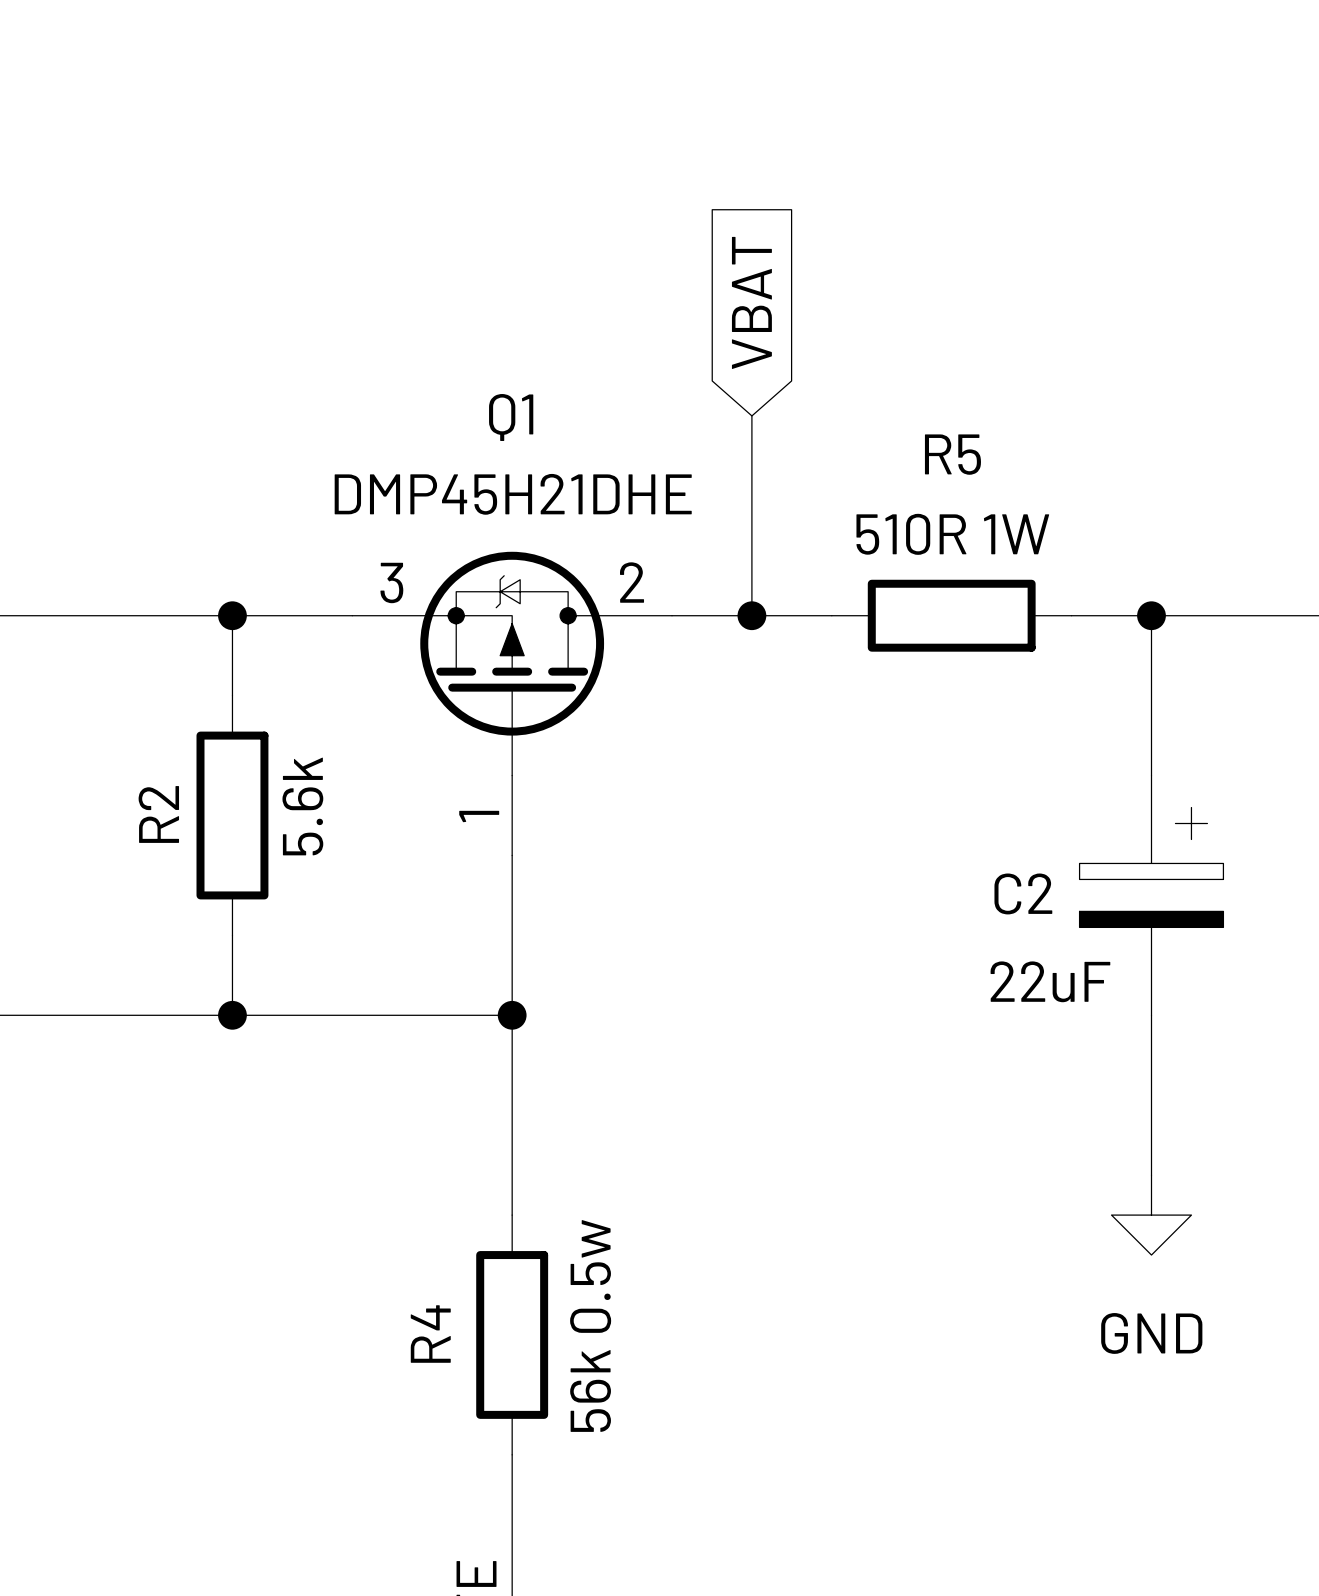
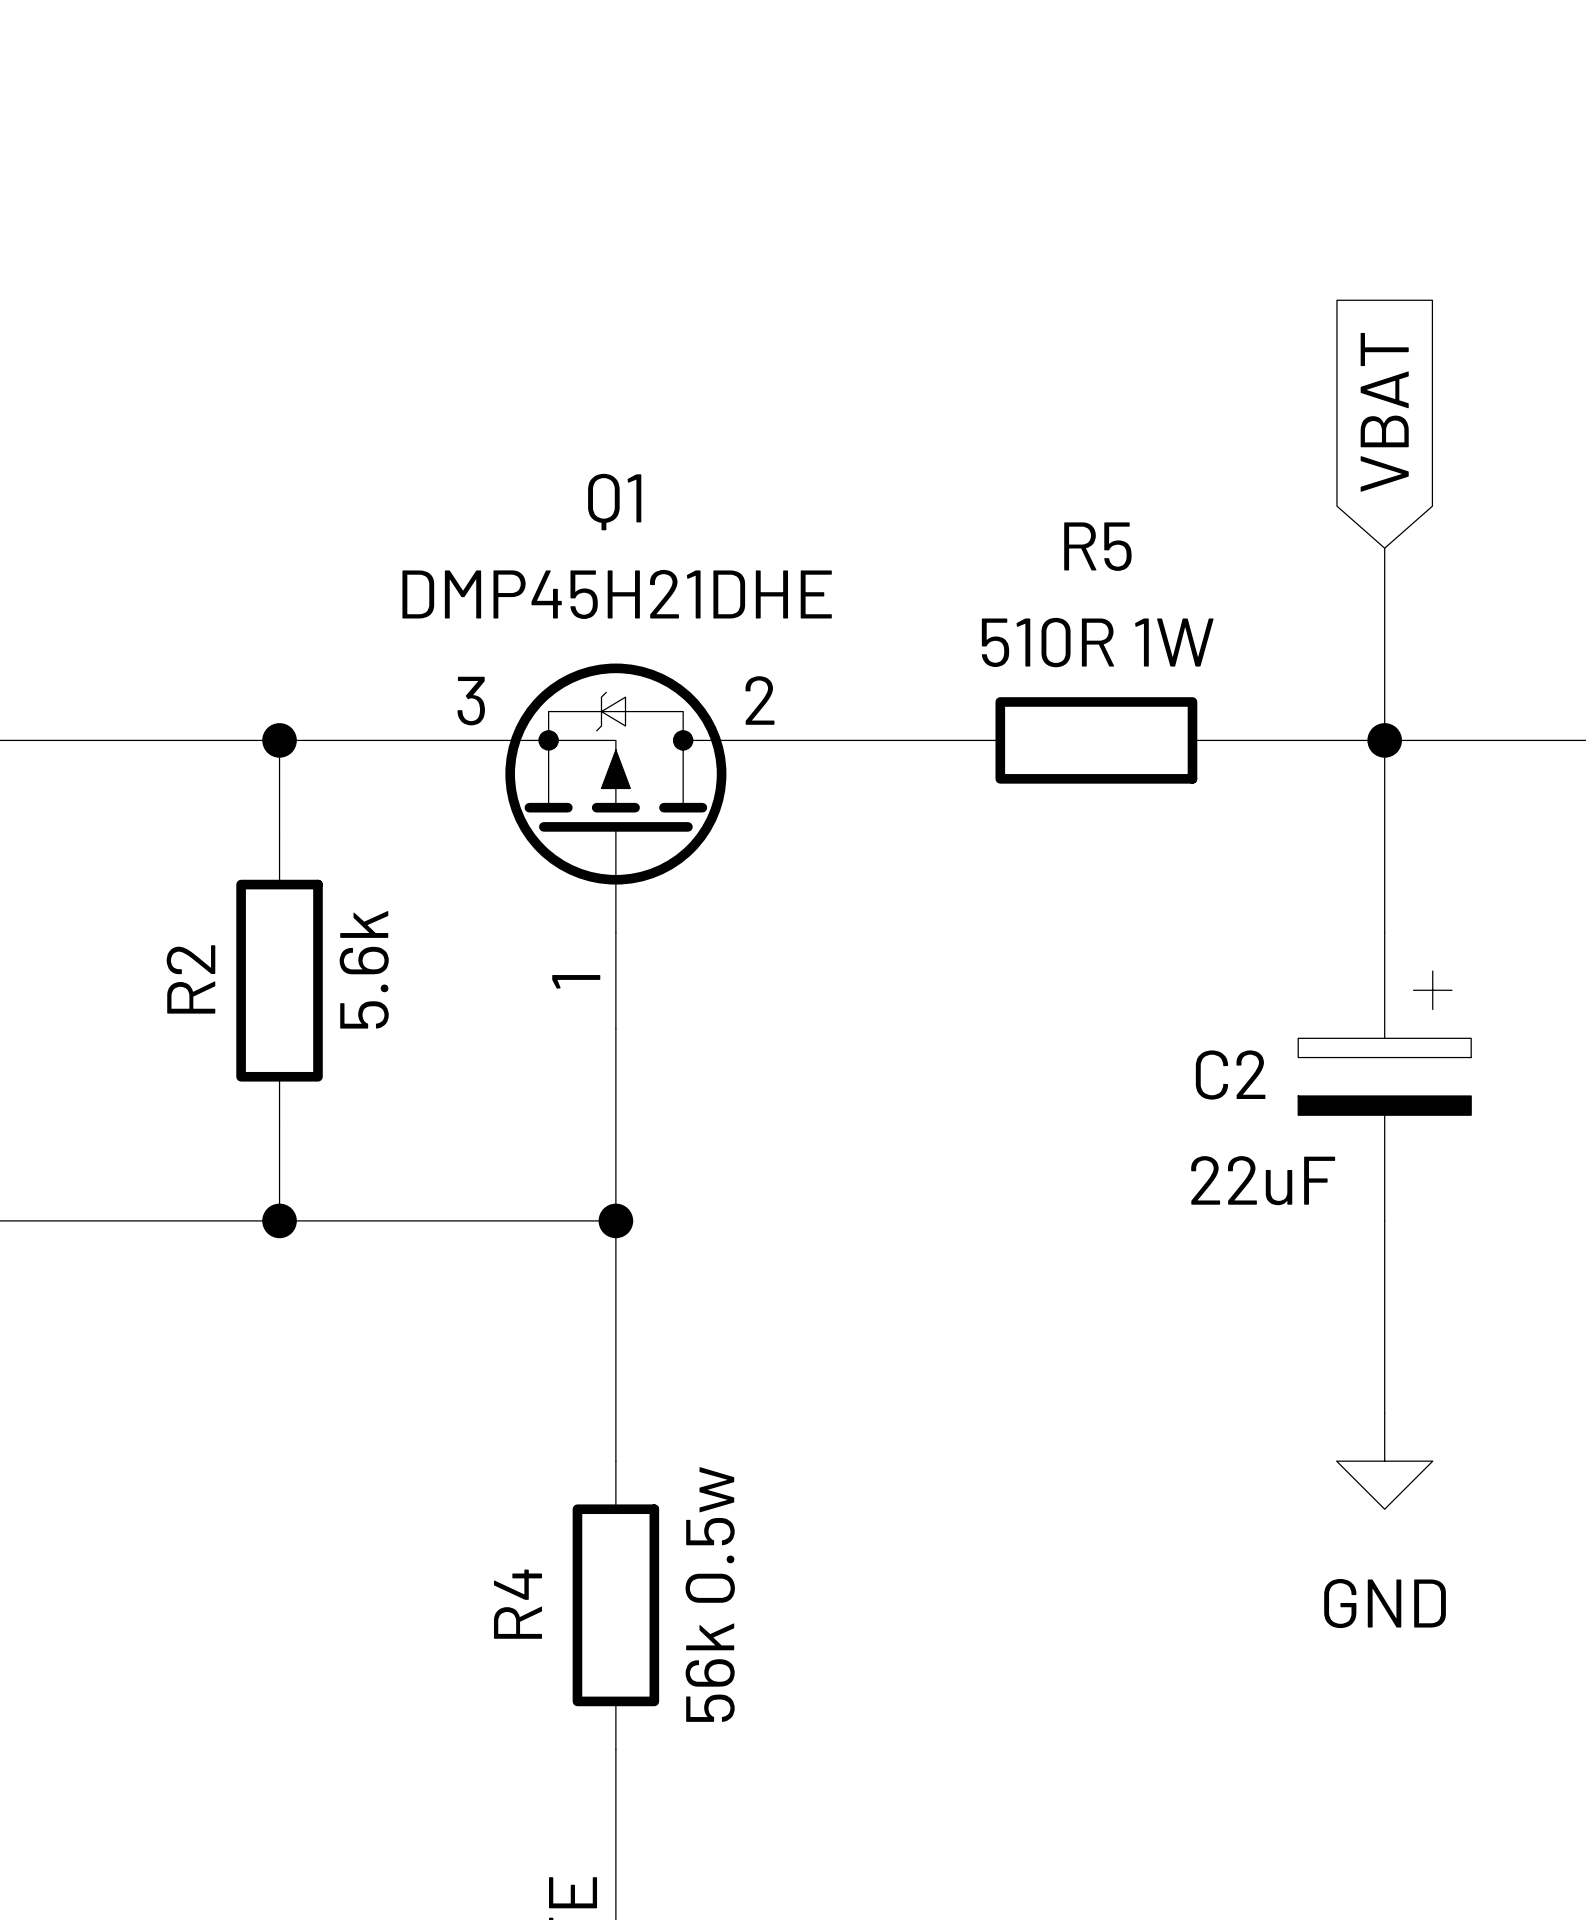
global label position: VBAT (751, 302) -> VBAT (1384, 412)
wire: (751, 415) (751, 615) -> none
wire: none -> (1384, 548) (1384, 740)
junction: (751, 615) -> none
R5 position: (951, 615) -> (1096, 740)

